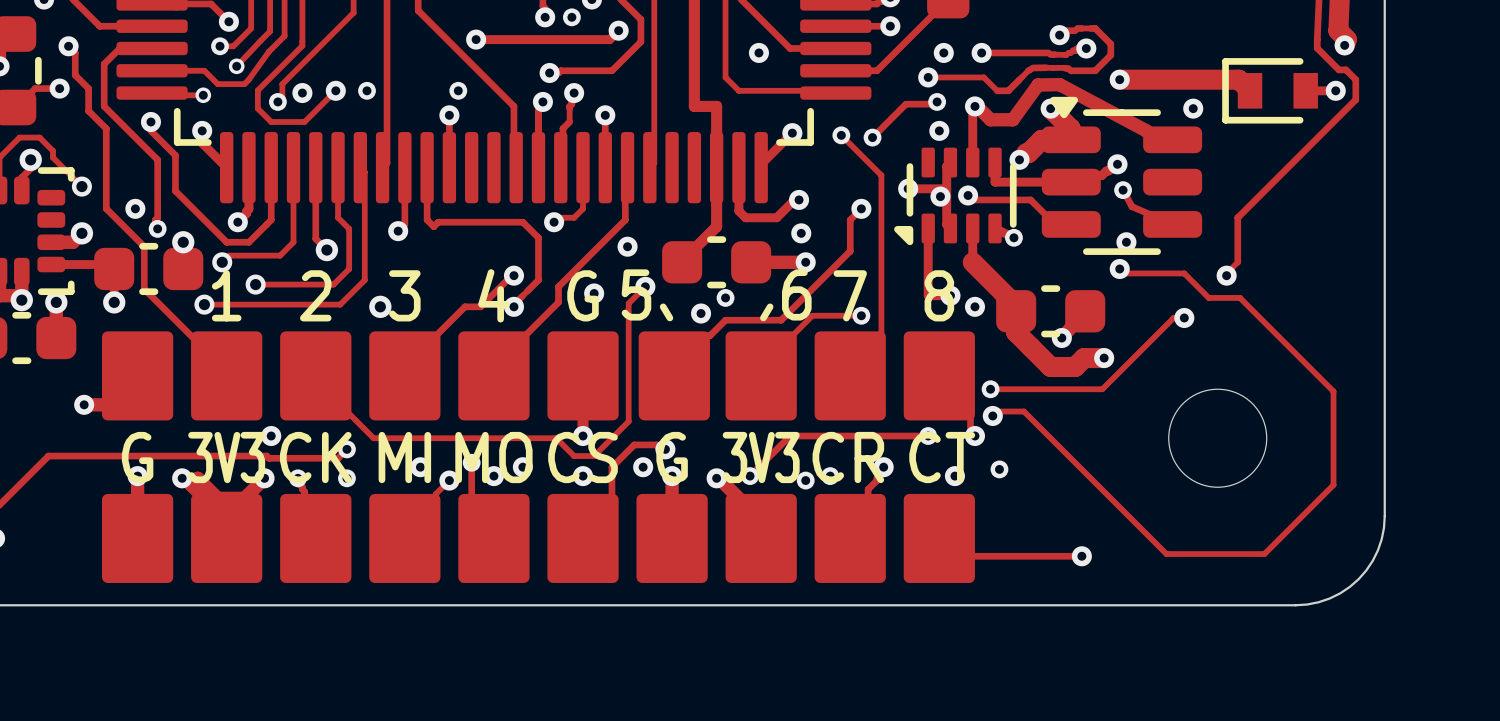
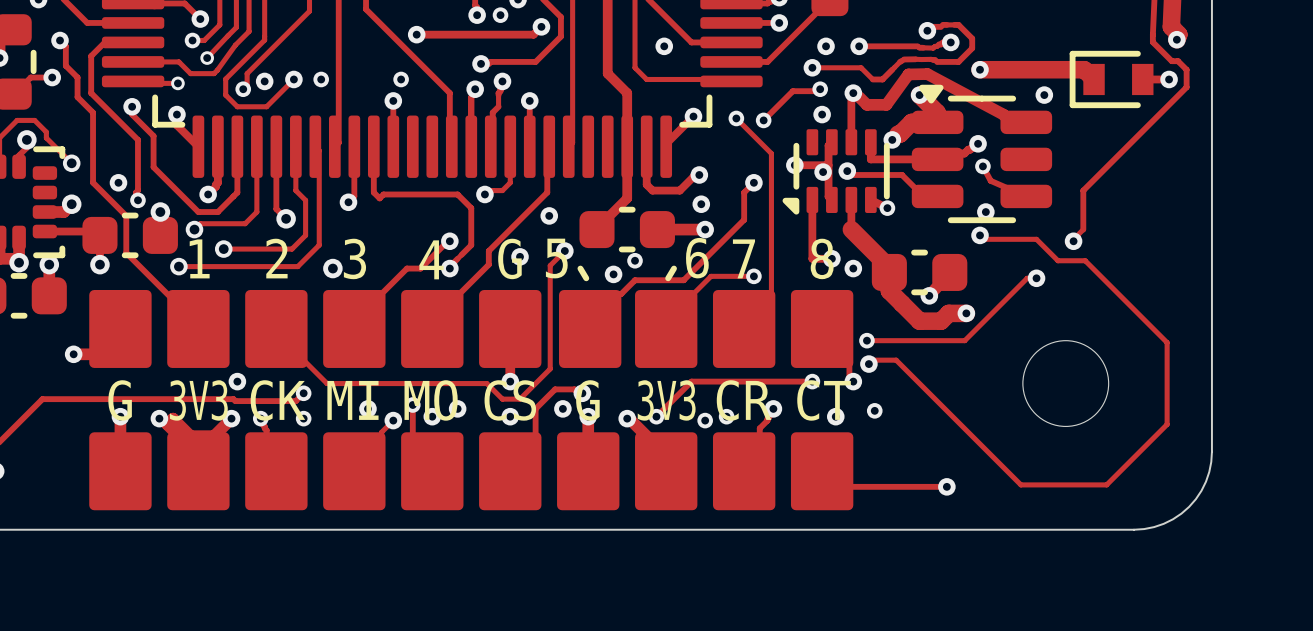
track: (694, 84) (694, 106) (716, 106) -> (607, 73) (627, 93)

